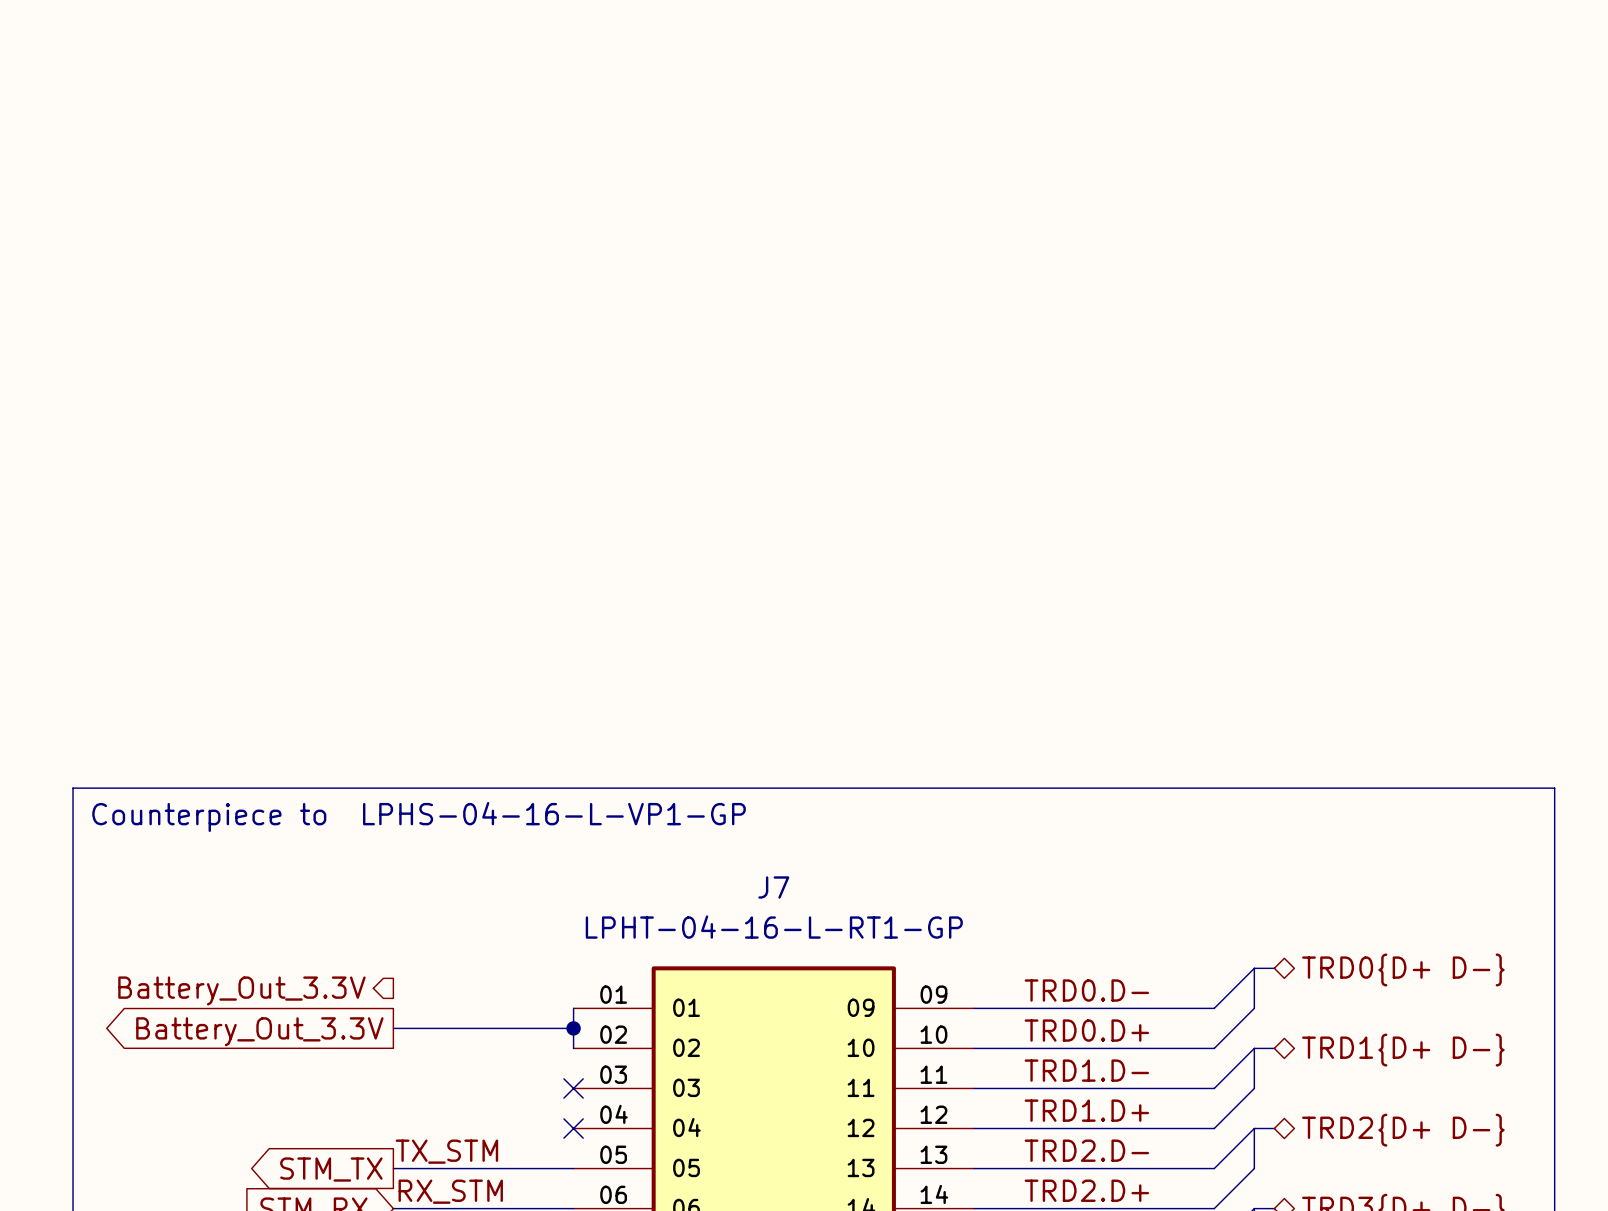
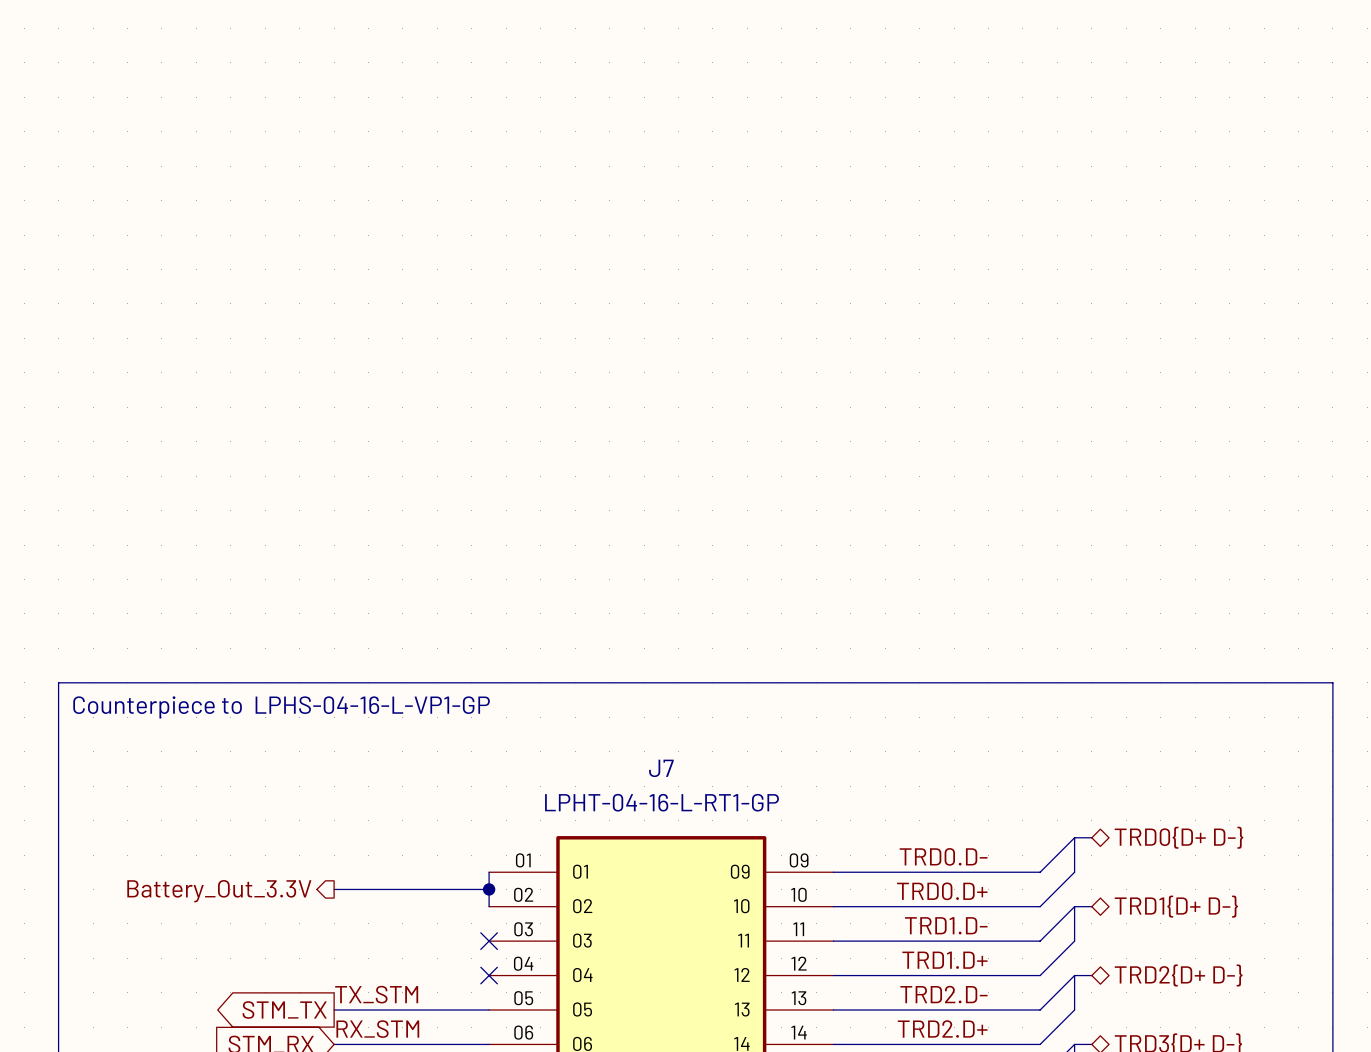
hierarchical label position: Battery_Out_3.3V (241, 990) -> Battery_Out_3.3V (219, 891)
global label: Battery_Out_3.3V (259, 1031) -> none

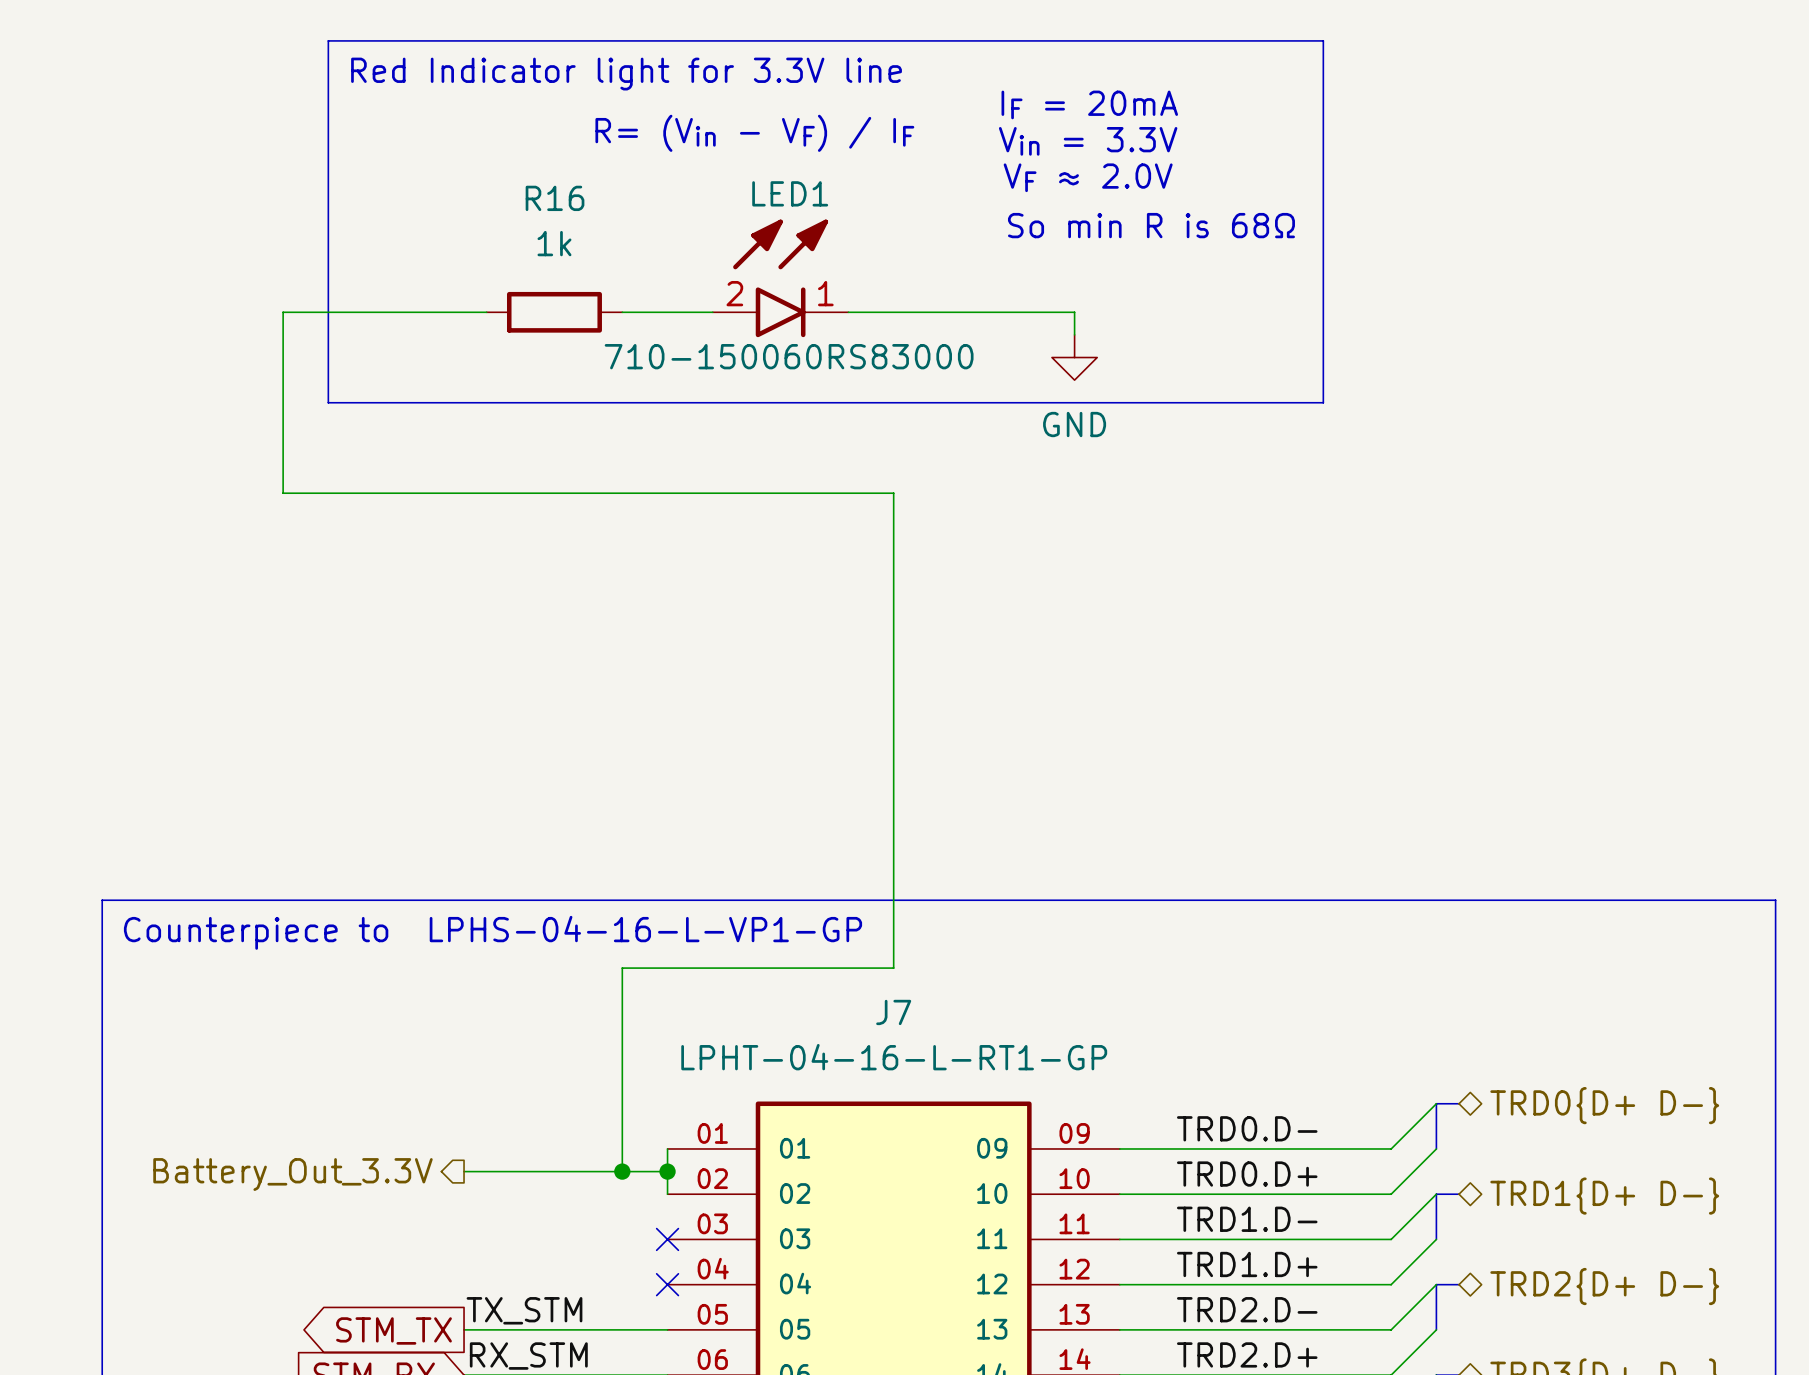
line: none -> (328, 40) (1323, 40) (1323, 402) (328, 402) (328, 40)
text: none -> Red Indicator light for 3.3V line (626, 74)
text: none -> IF = 20mA (1089, 104)
text: none -> R= (Vin - VF) / IF (754, 133)
text: none -> Vin = 3.3V (1088, 141)
text: none -> VF ≈ 2.0V (1088, 177)
text: none -> So min R is 68Ω (1151, 225)
LED1: none -> 710-150060RS83000 (780, 278)
wire: none -> (486, 312) (283, 312) (283, 493) (893, 493) (893, 968) (622, 968) (622, 1171)
R16: none -> 1k (554, 312)
wire: none -> (622, 312) (712, 312)
wire: none -> (848, 312) (1074, 312) (1074, 334)
power symbol: none -> GND (1074, 357)
junction: none -> (622, 1171)

